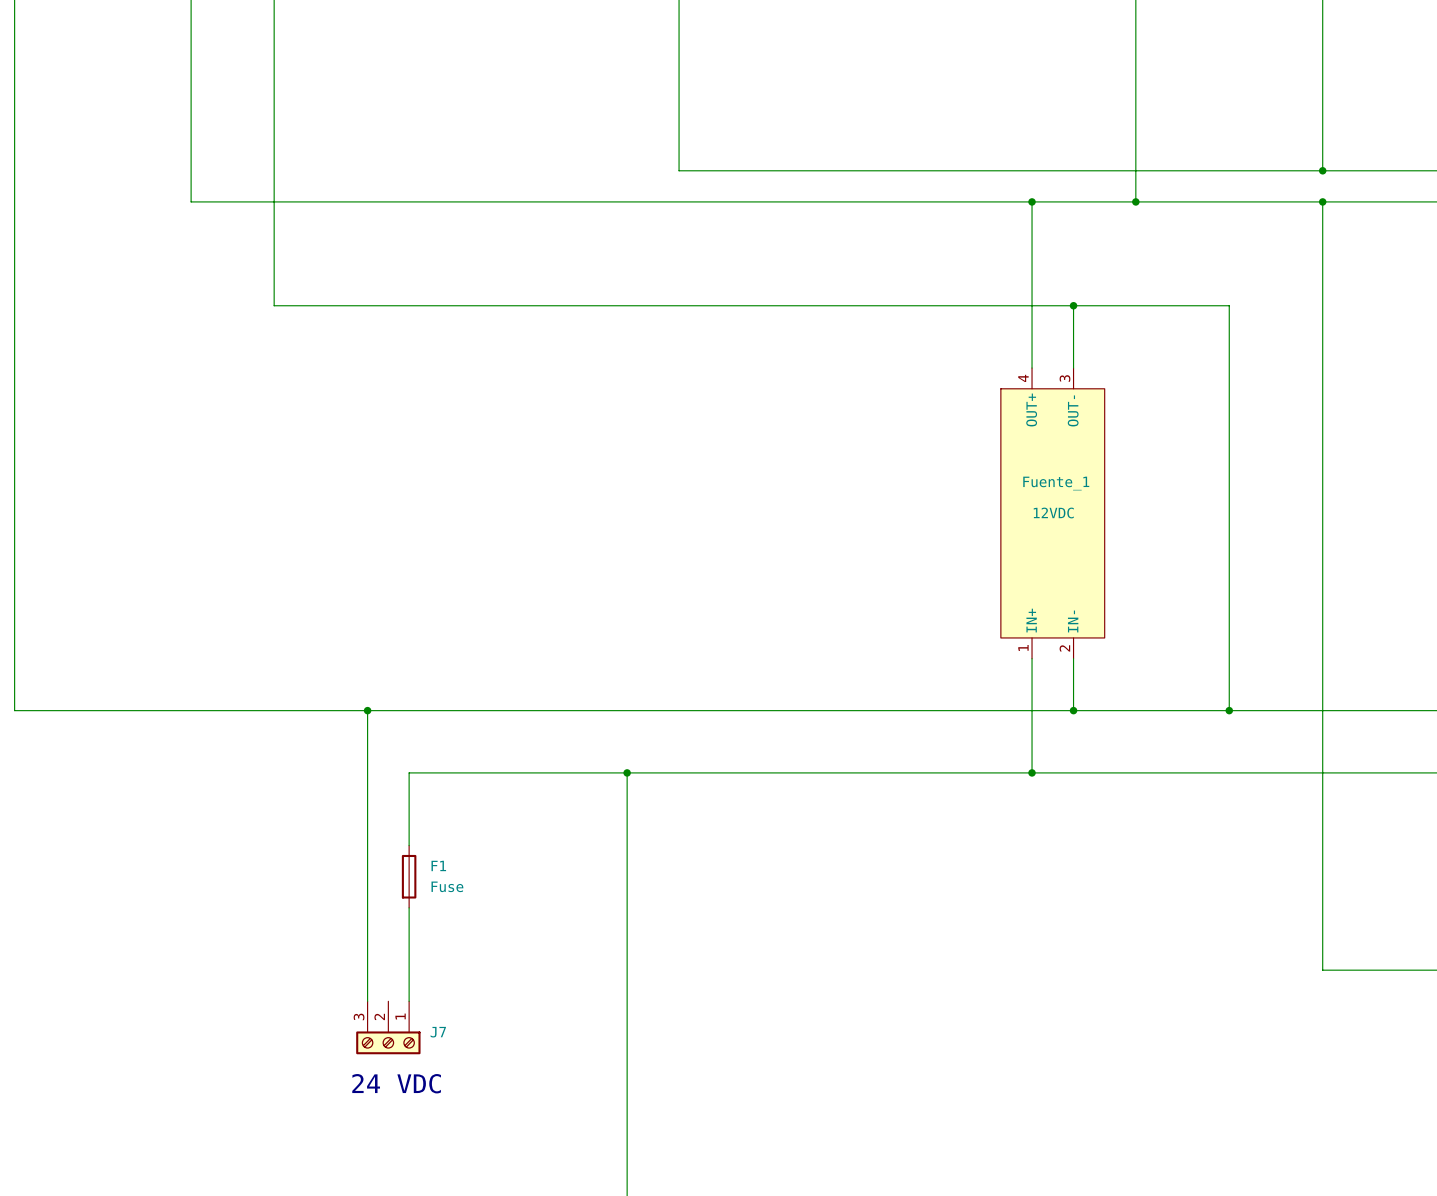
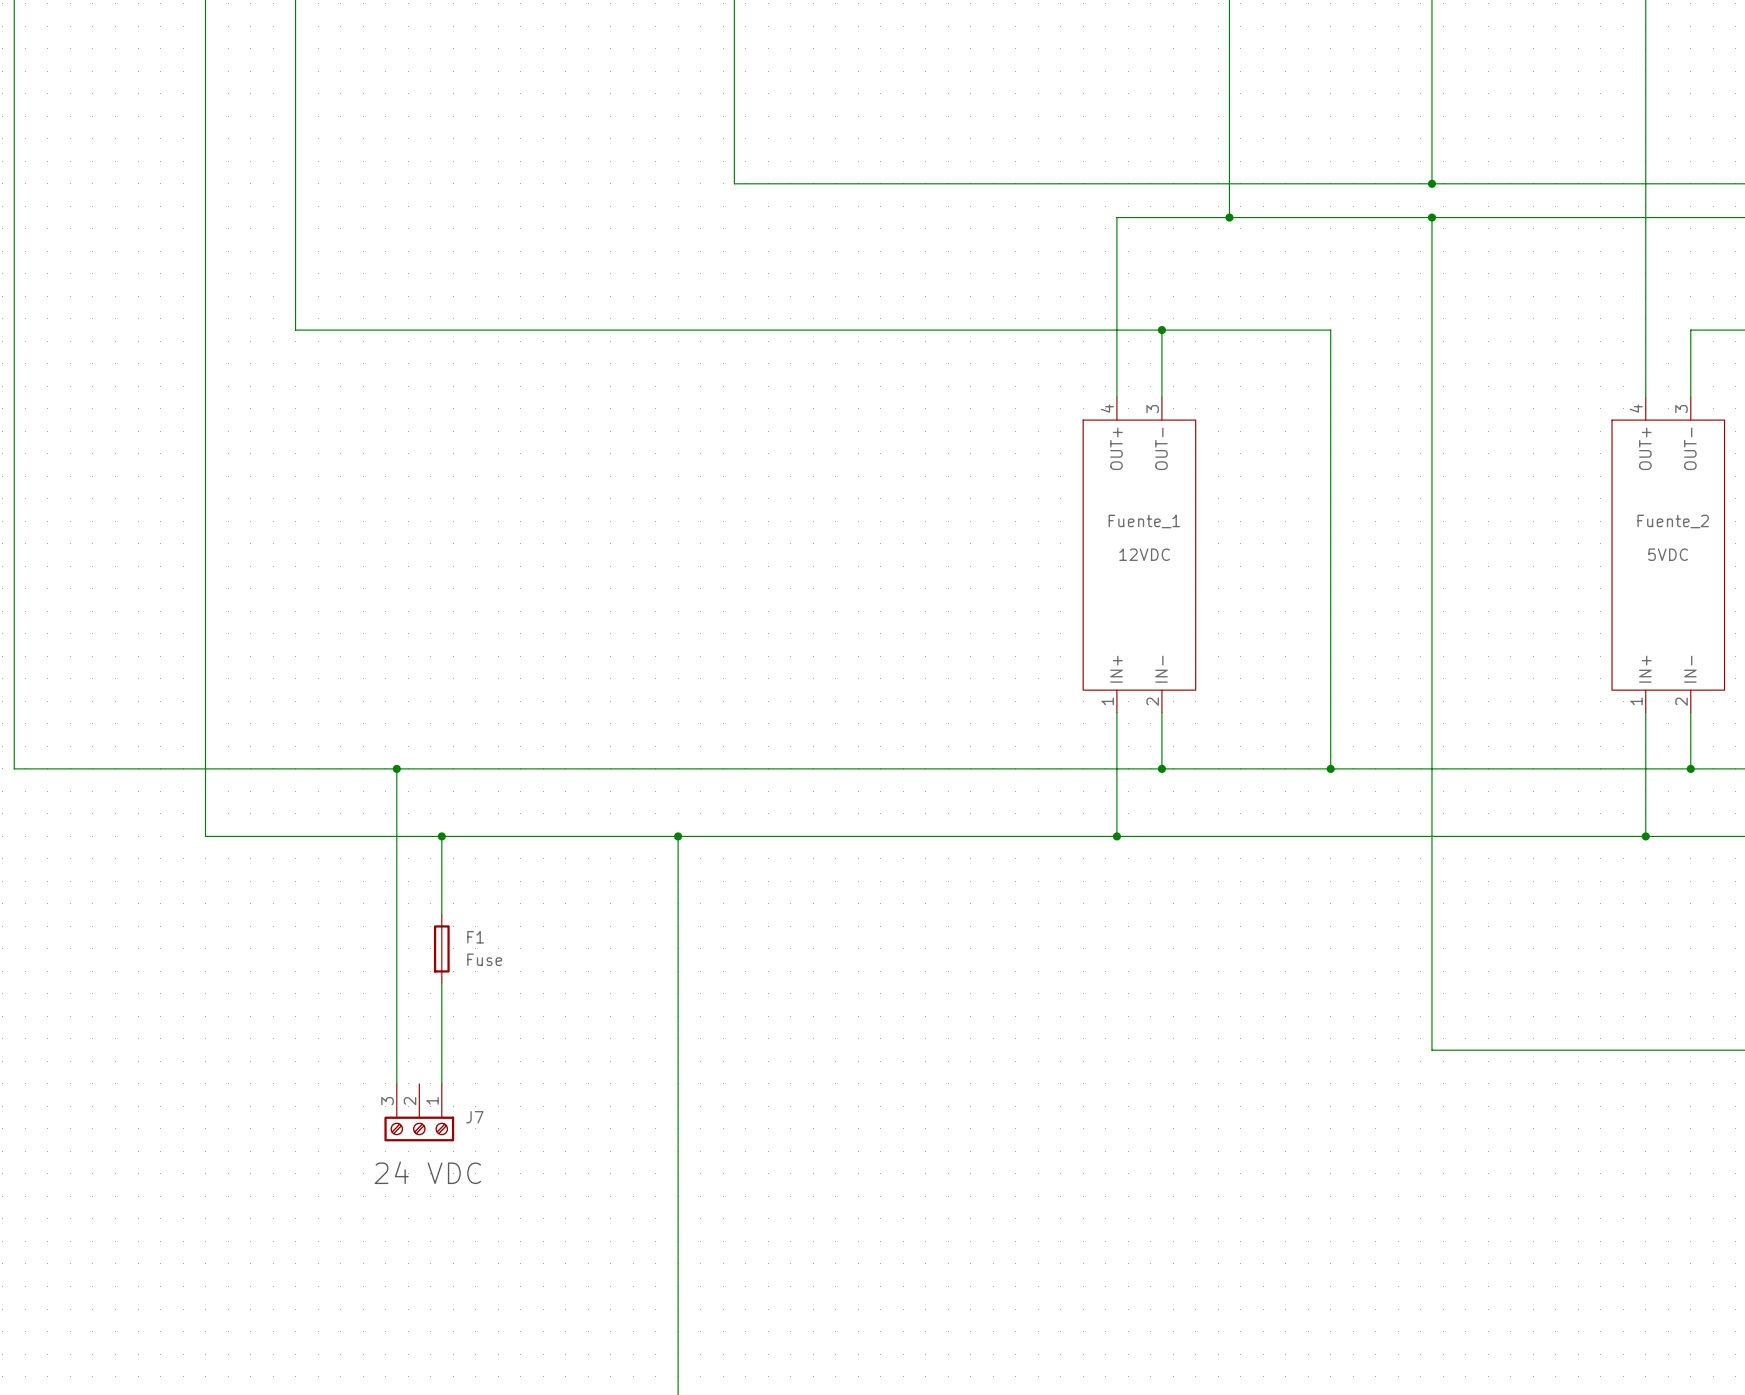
wire: (191, 201) (1032, 201) -> (205, 217) (205, 836) (441, 836)
junction: (1032, 201) -> none
junction: none -> (441, 836)

